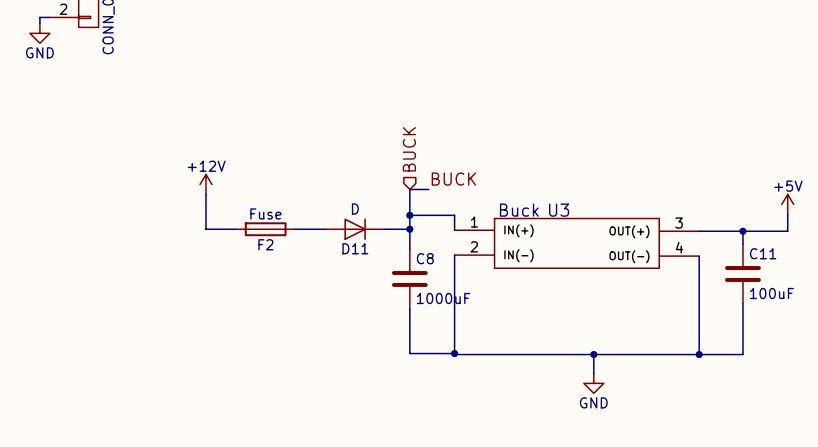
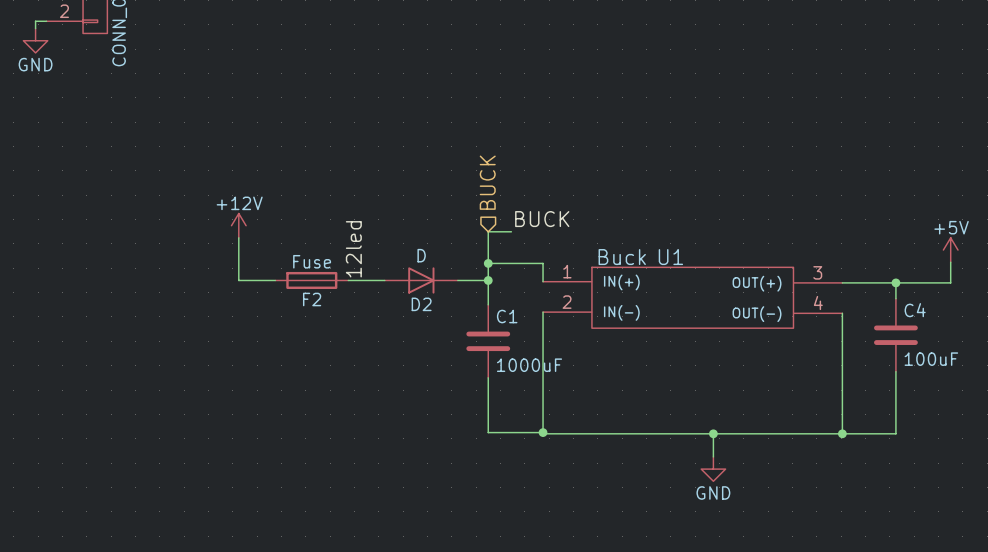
label: none -> 12led (353, 249)
U3 name: U3 (559, 210) -> U1 (670, 257)
D11 name: D11 (355, 248) -> D2 (421, 304)
C11 name: C11 (763, 253) -> C4 (915, 310)
C8 name: C8 (425, 258) -> C1 (507, 316)

